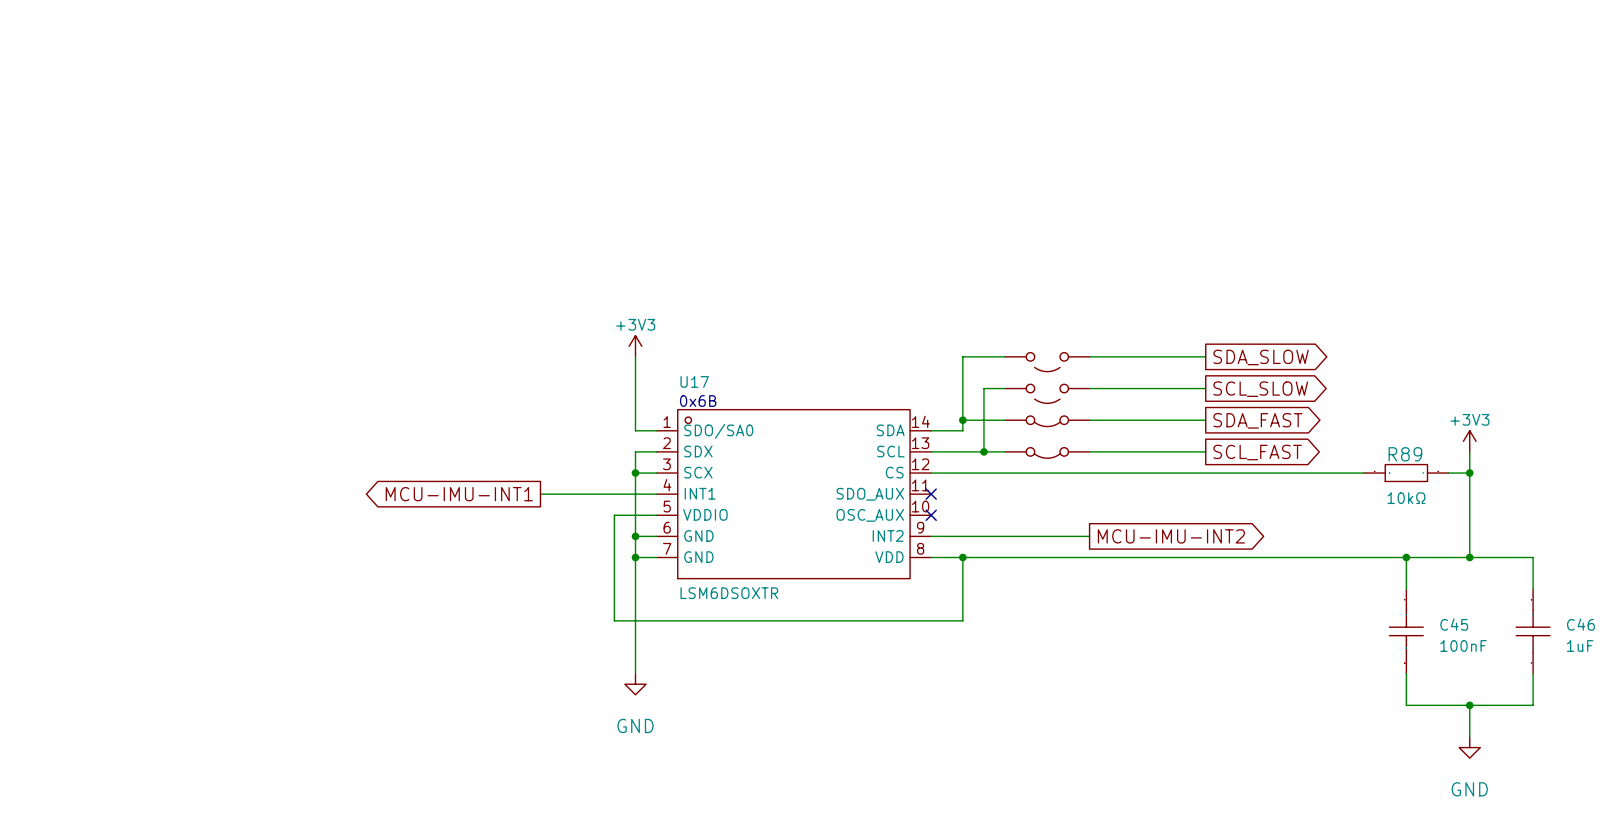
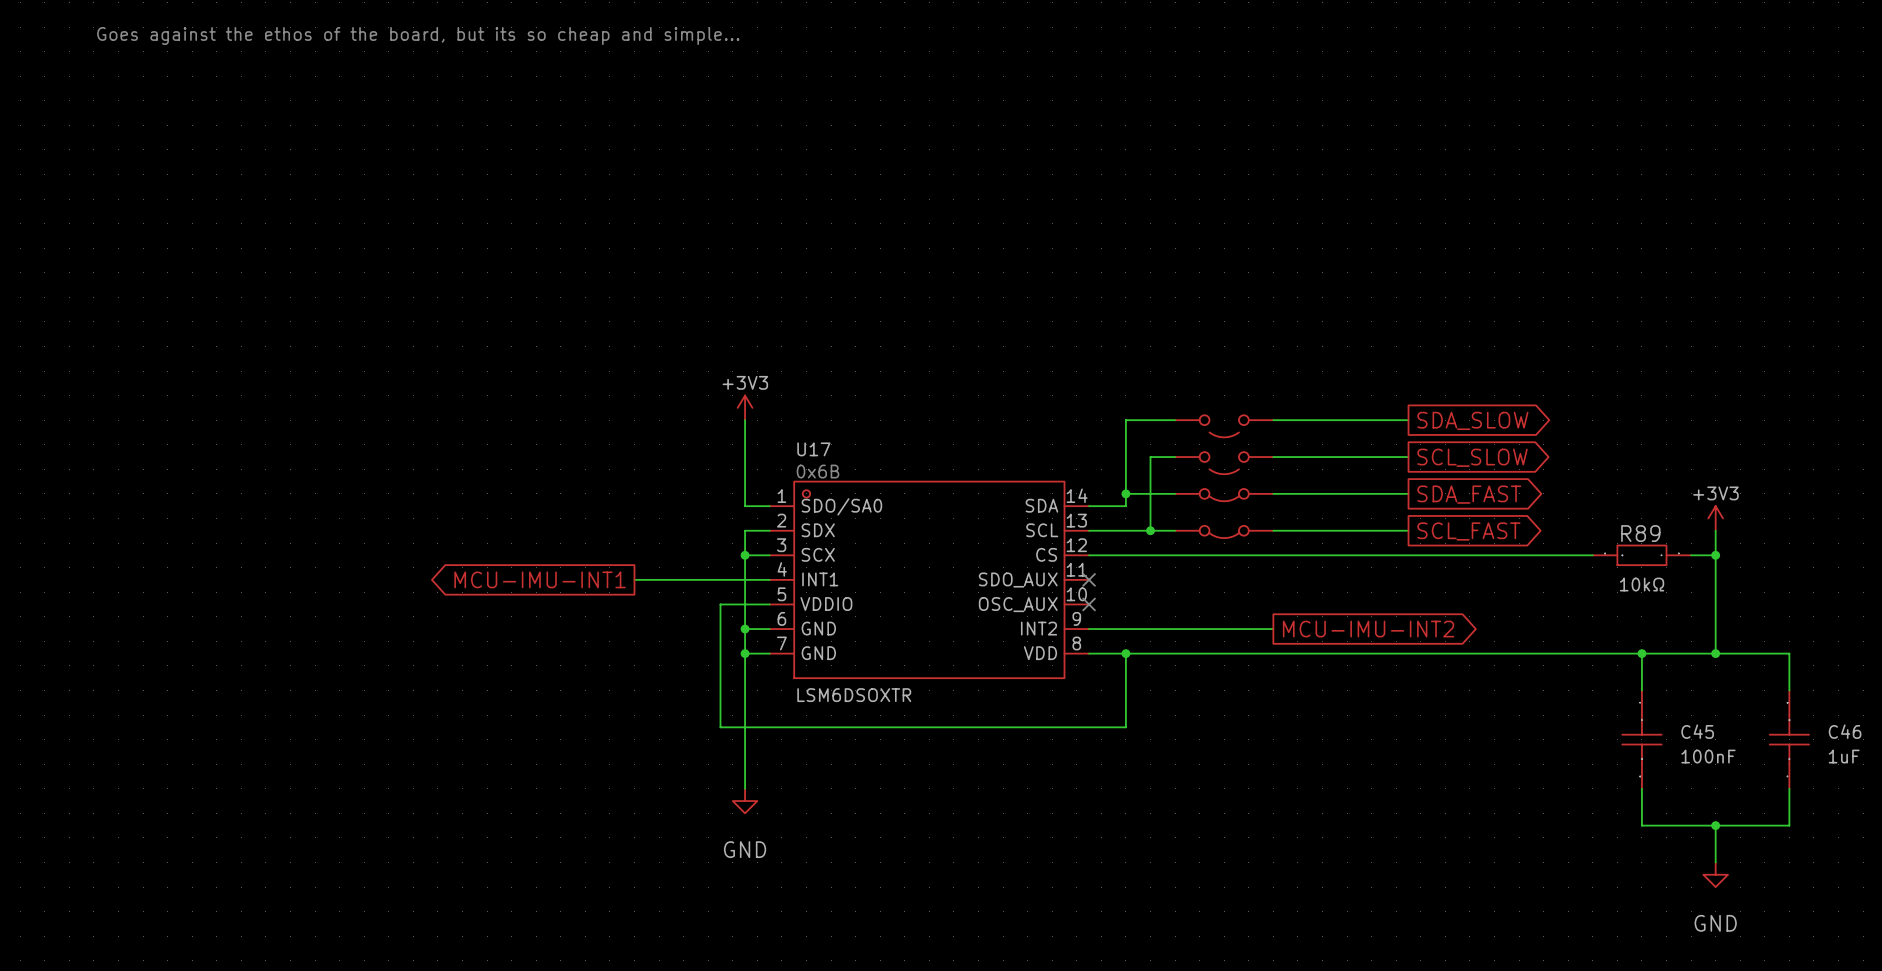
text: none -> Goes against the ethos of the board, but its so cheap and simple... (418, 36)

